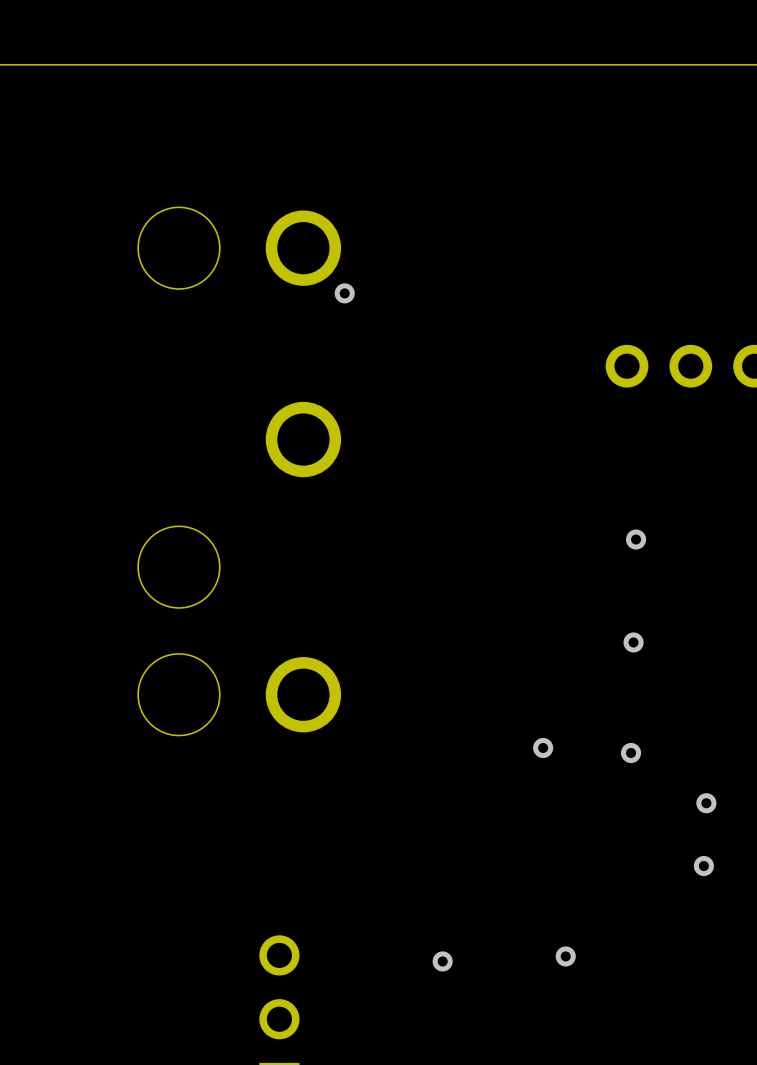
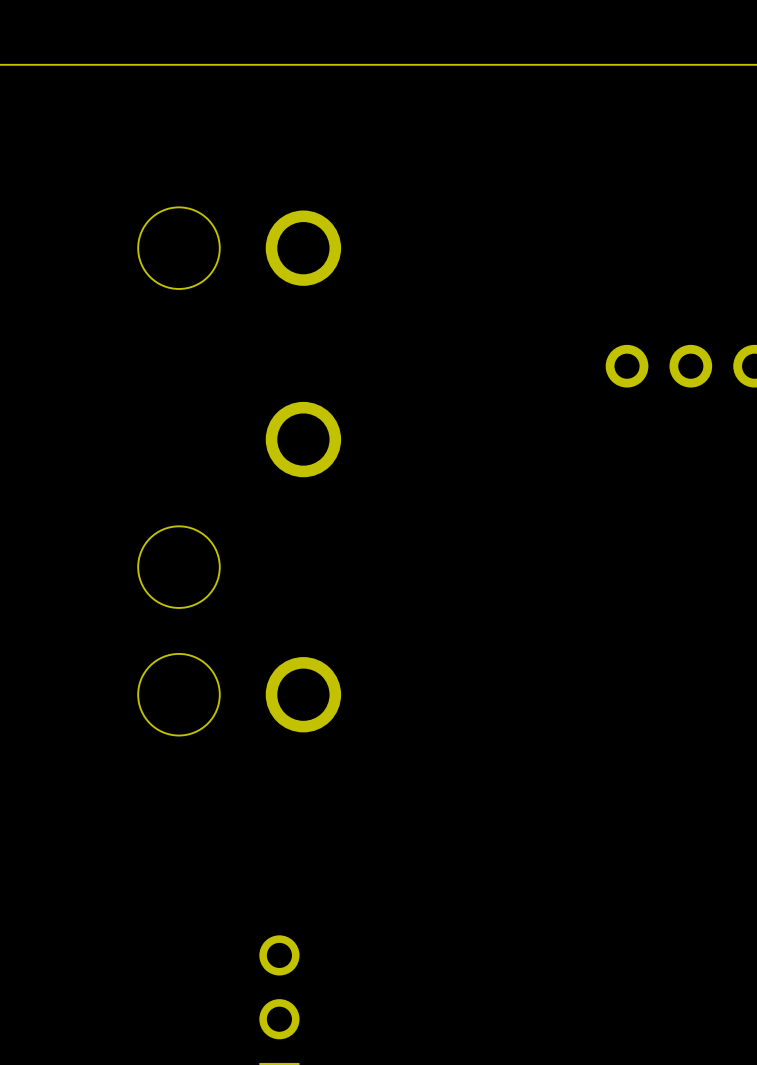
via: (344, 293) -> none
via: (636, 539) -> none
via: (633, 642) -> none
via: (543, 747) -> none
via: (631, 752) -> none
via: (706, 803) -> none
via: (703, 866) -> none
via: (565, 956) -> none
via: (442, 961) -> none

